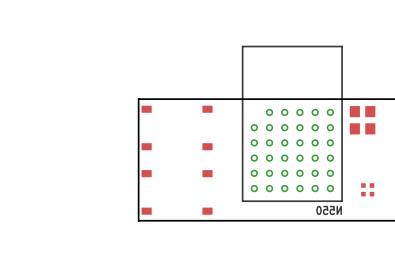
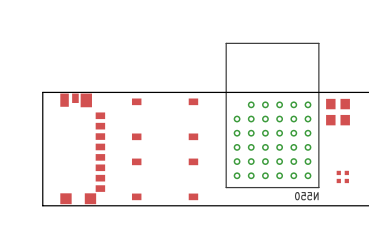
board edge: (138, 99) (138, 220) -> (129, 92) (42, 92) (42, 205) (129, 205)
part: none -> (82, 148)

